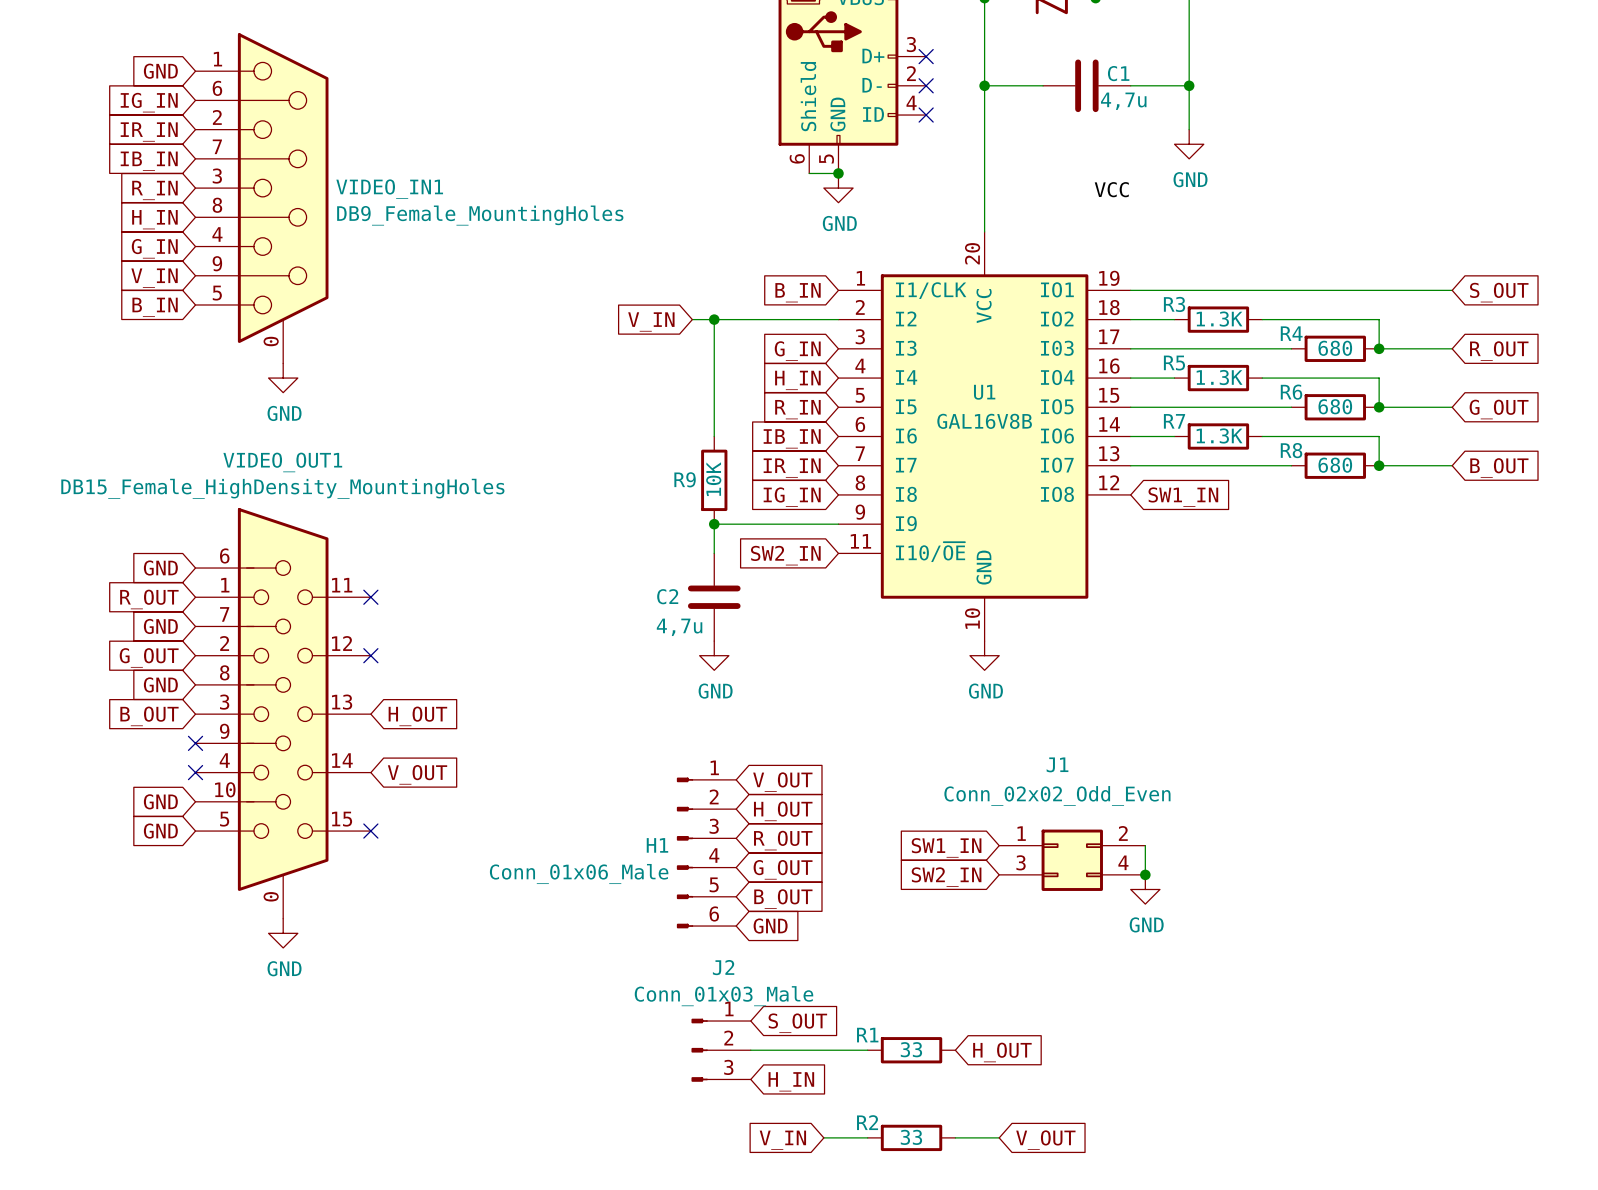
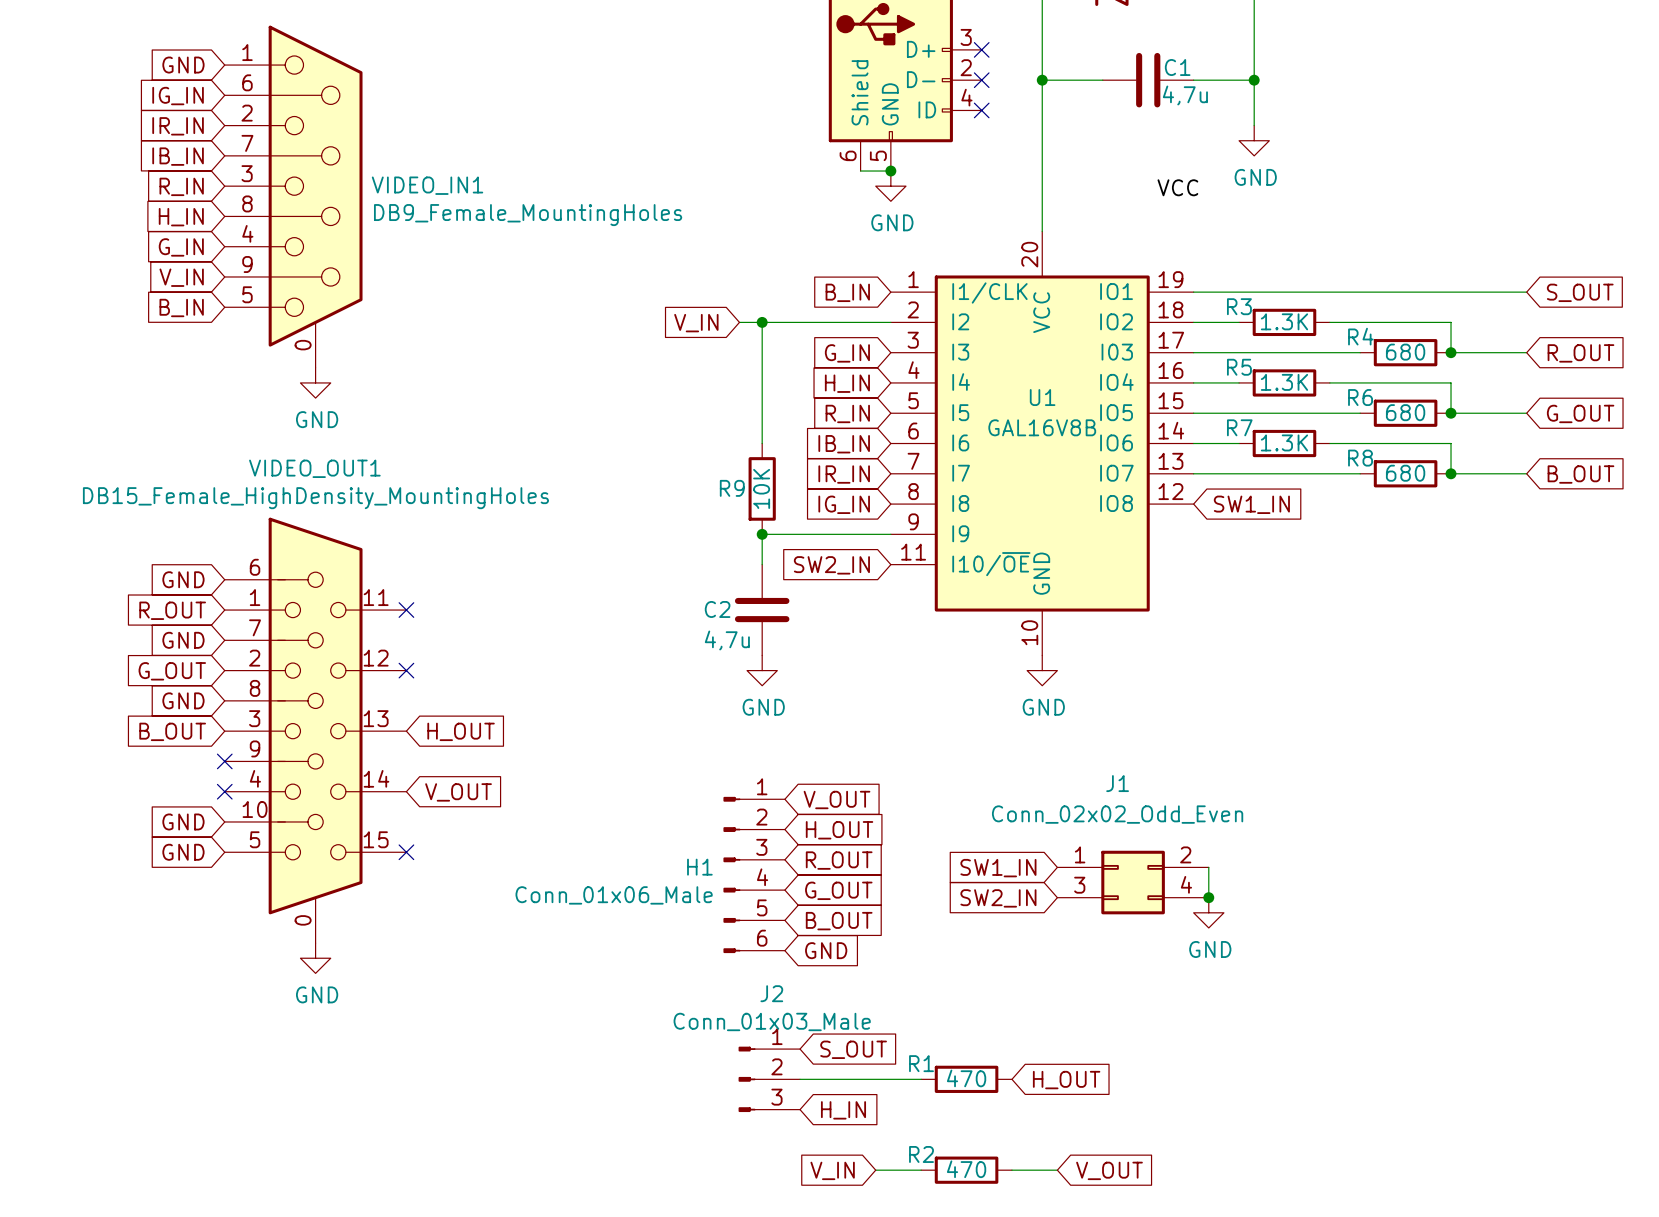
R1 value: 33 (911, 1049) -> 470 (966, 1078)
R2 value: 33 (911, 1137) -> 470 (966, 1169)

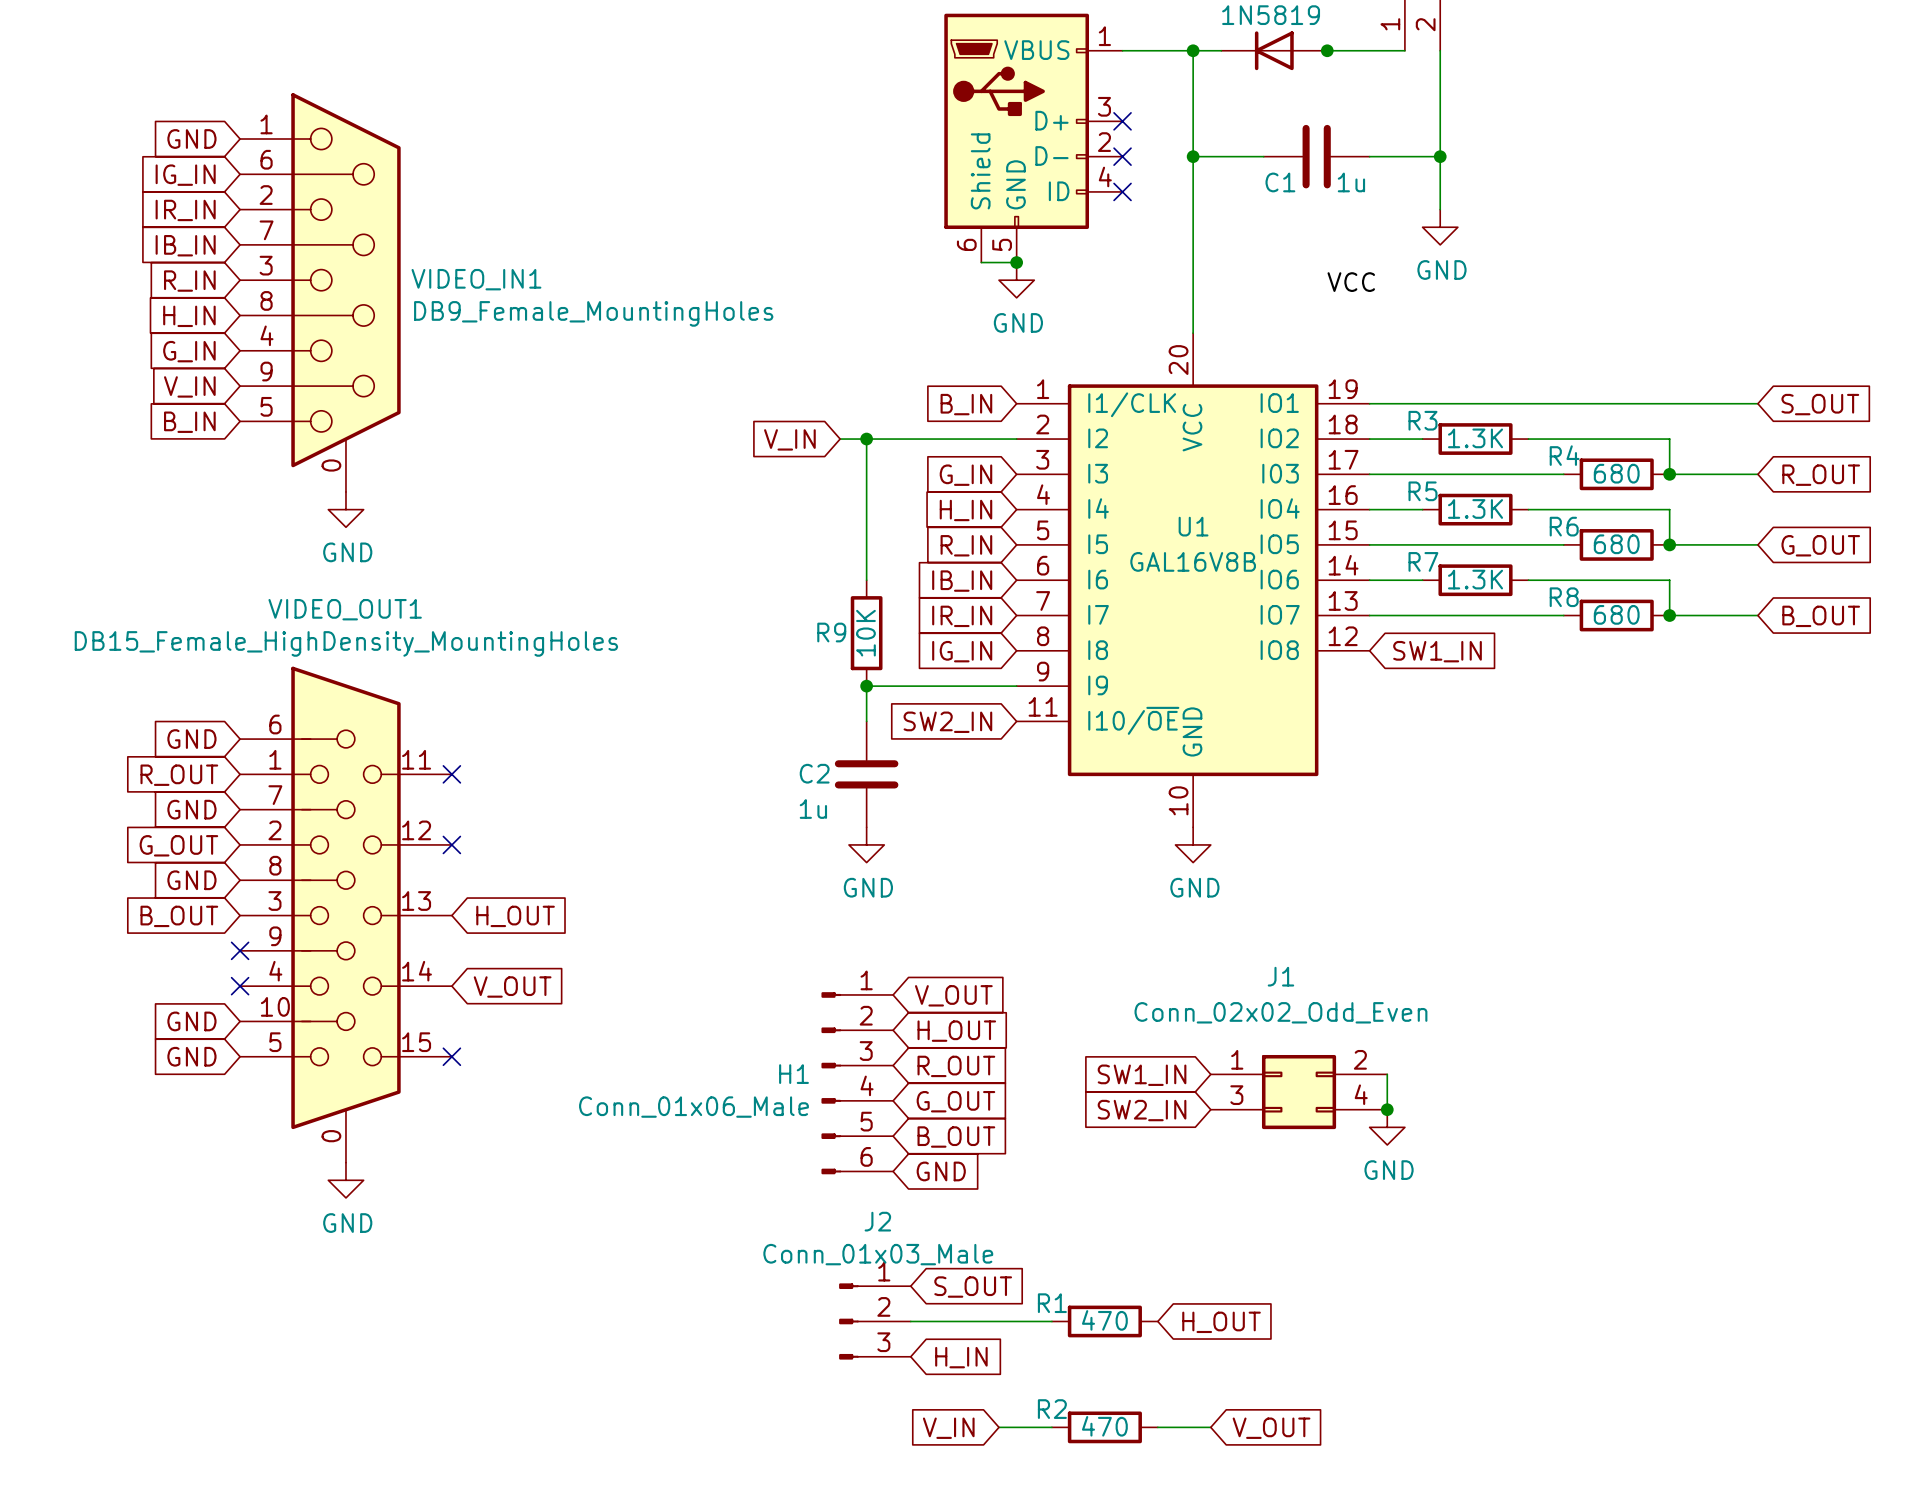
C1 name position: C1 (1177, 67) -> C1 (1280, 182)
C1 value: 4,7u (1185, 95) -> 1u (1351, 182)
C2 value: 4,7u (727, 640) -> 1u (813, 809)

